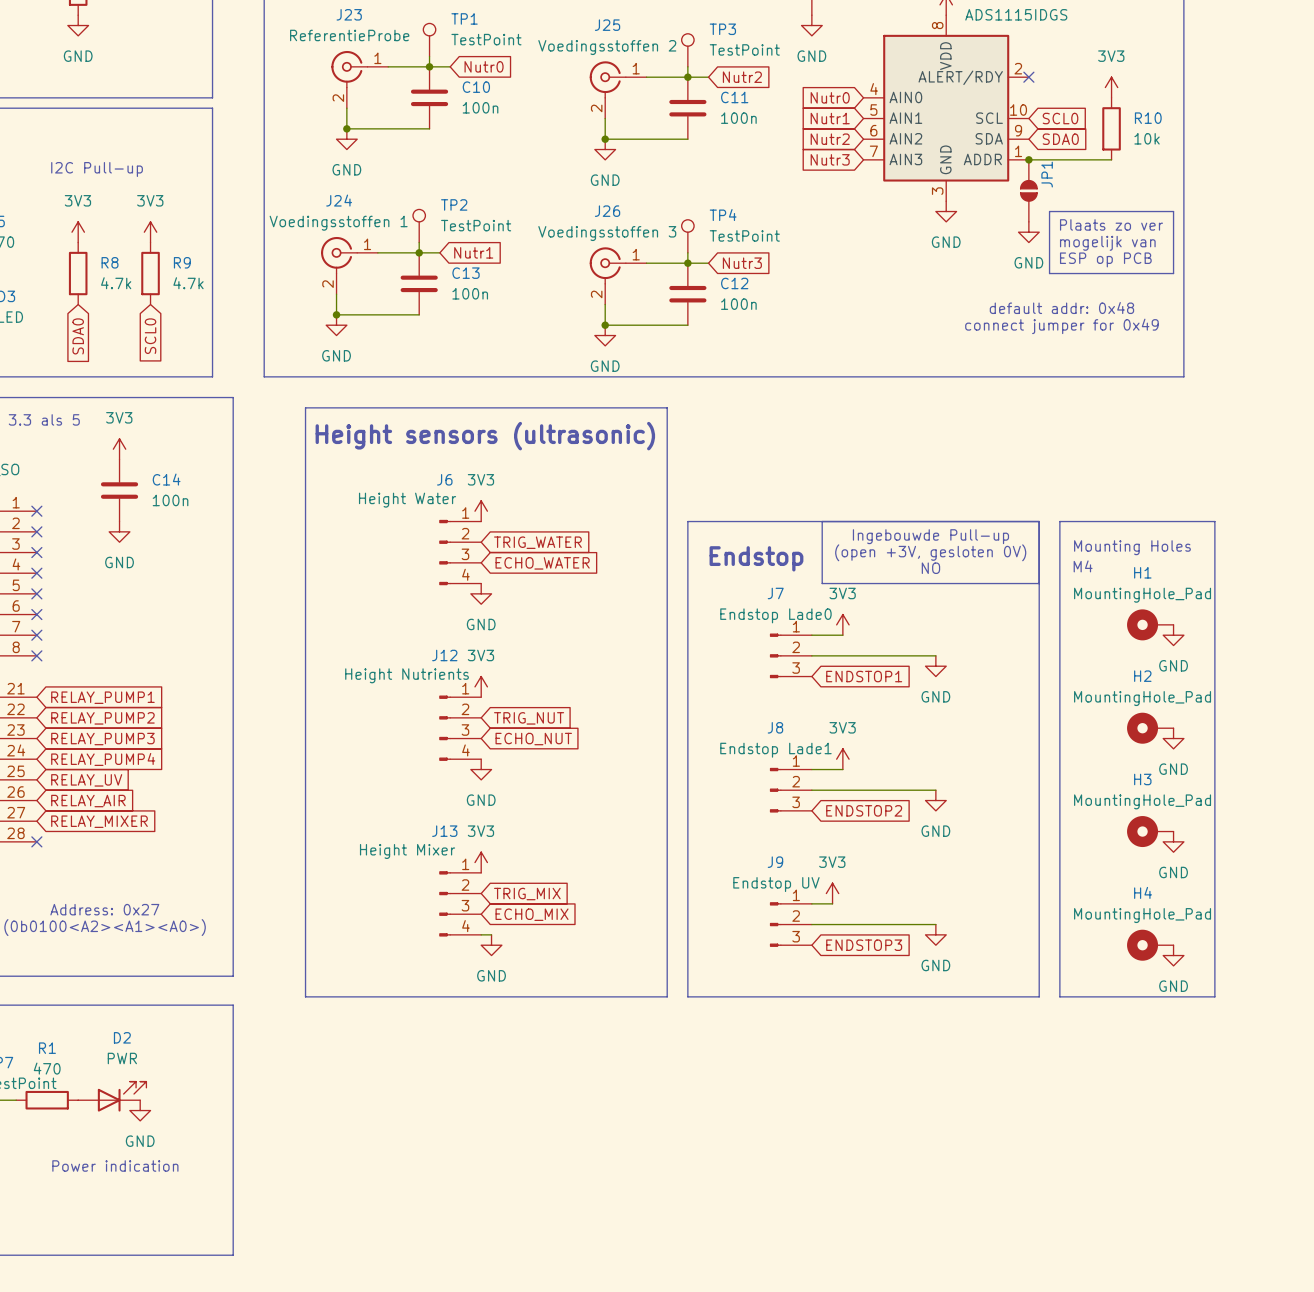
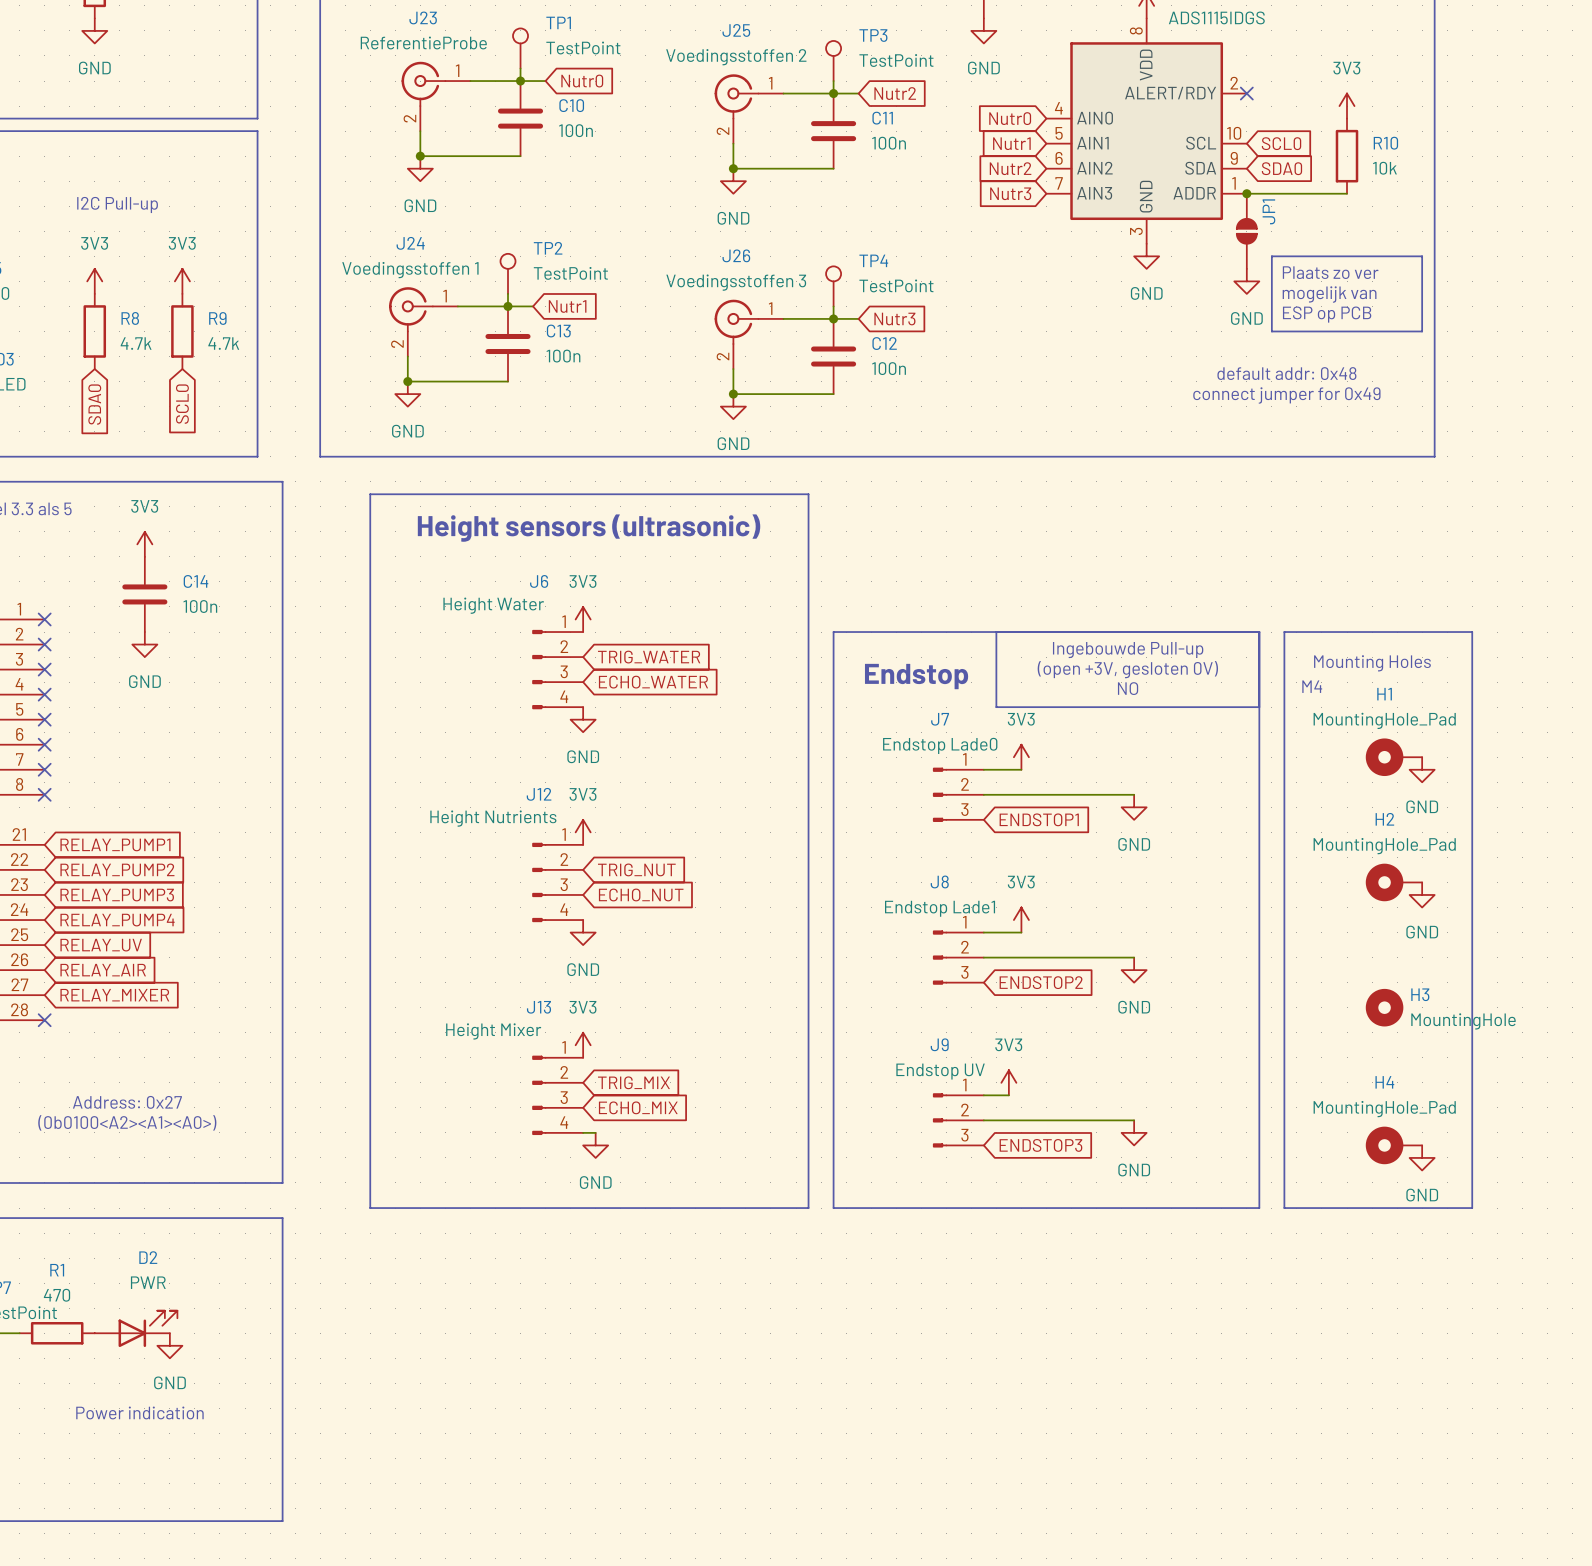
H3 name position: H3 (1142, 779) -> H3 (1420, 994)
H3 value: MountingHole_Pad (1142, 801) -> MountingHole (1463, 1021)
H3 symbol: [1127, 816, 1174, 848] -> [1365, 988, 1404, 1027]
power symbol: GND (1173, 841) -> none

